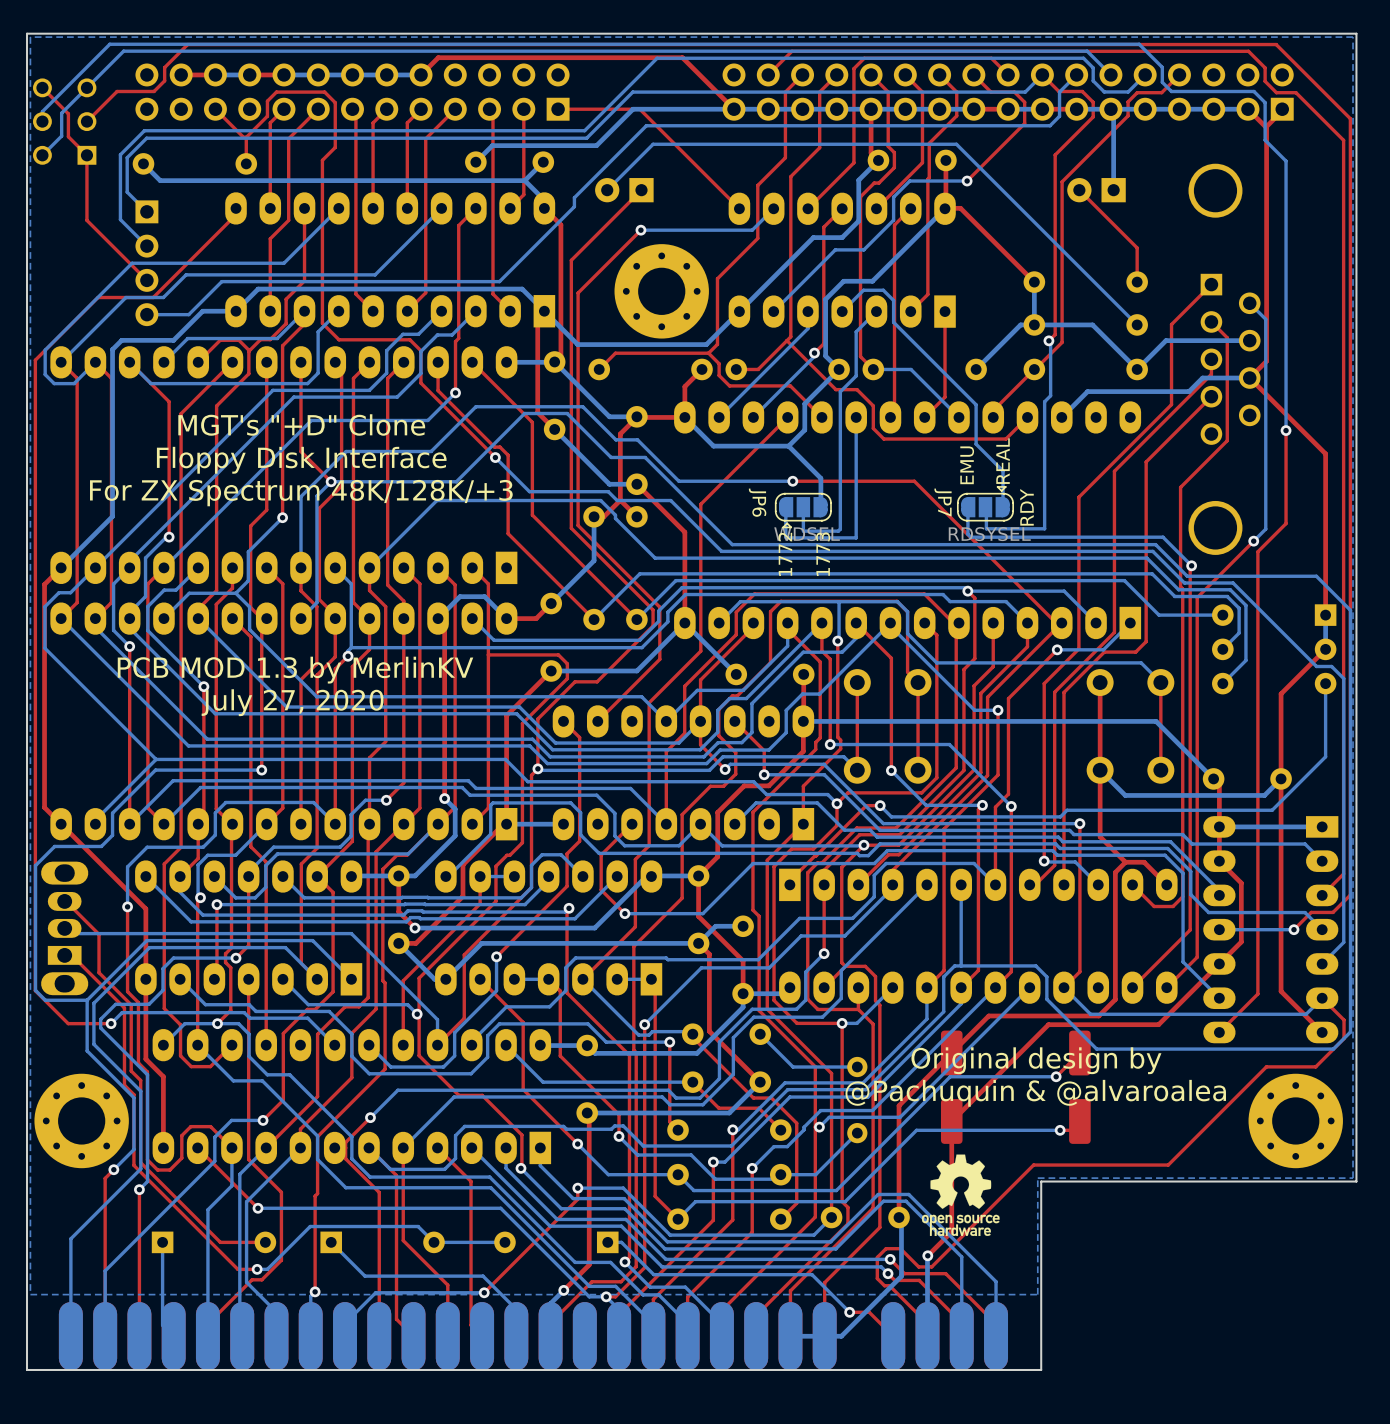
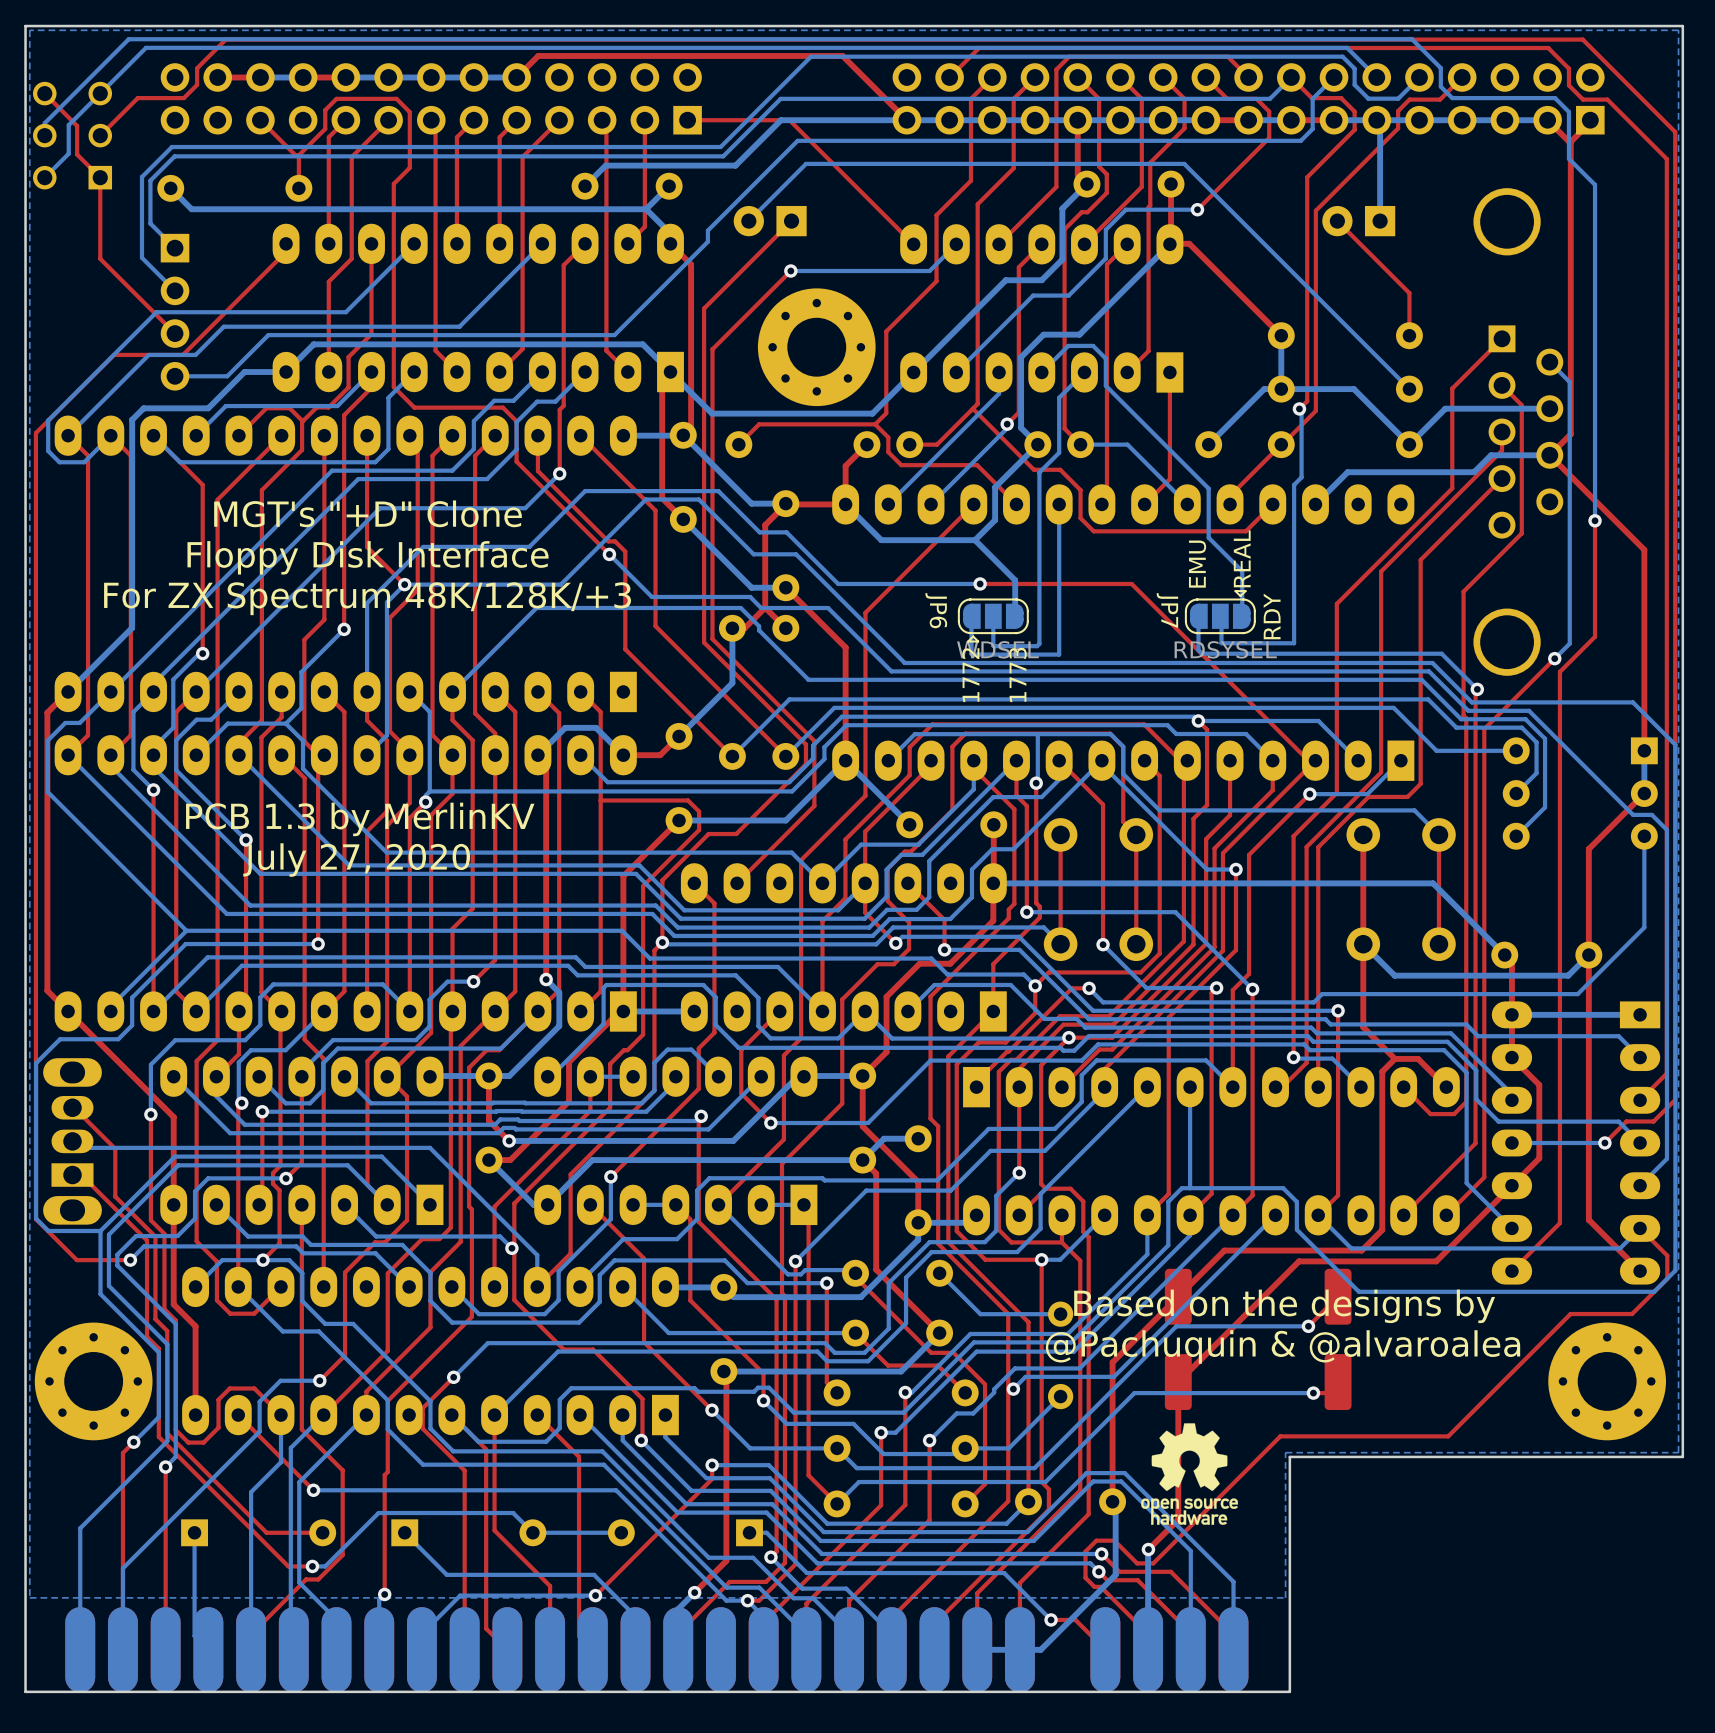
text: PCB MOD 1.3 by MerlinKV (295, 670) -> PCB 1.3 by MerlinKV (360, 819)
text: Original design by (1036, 1060) -> Based on the designs by (1284, 1306)

